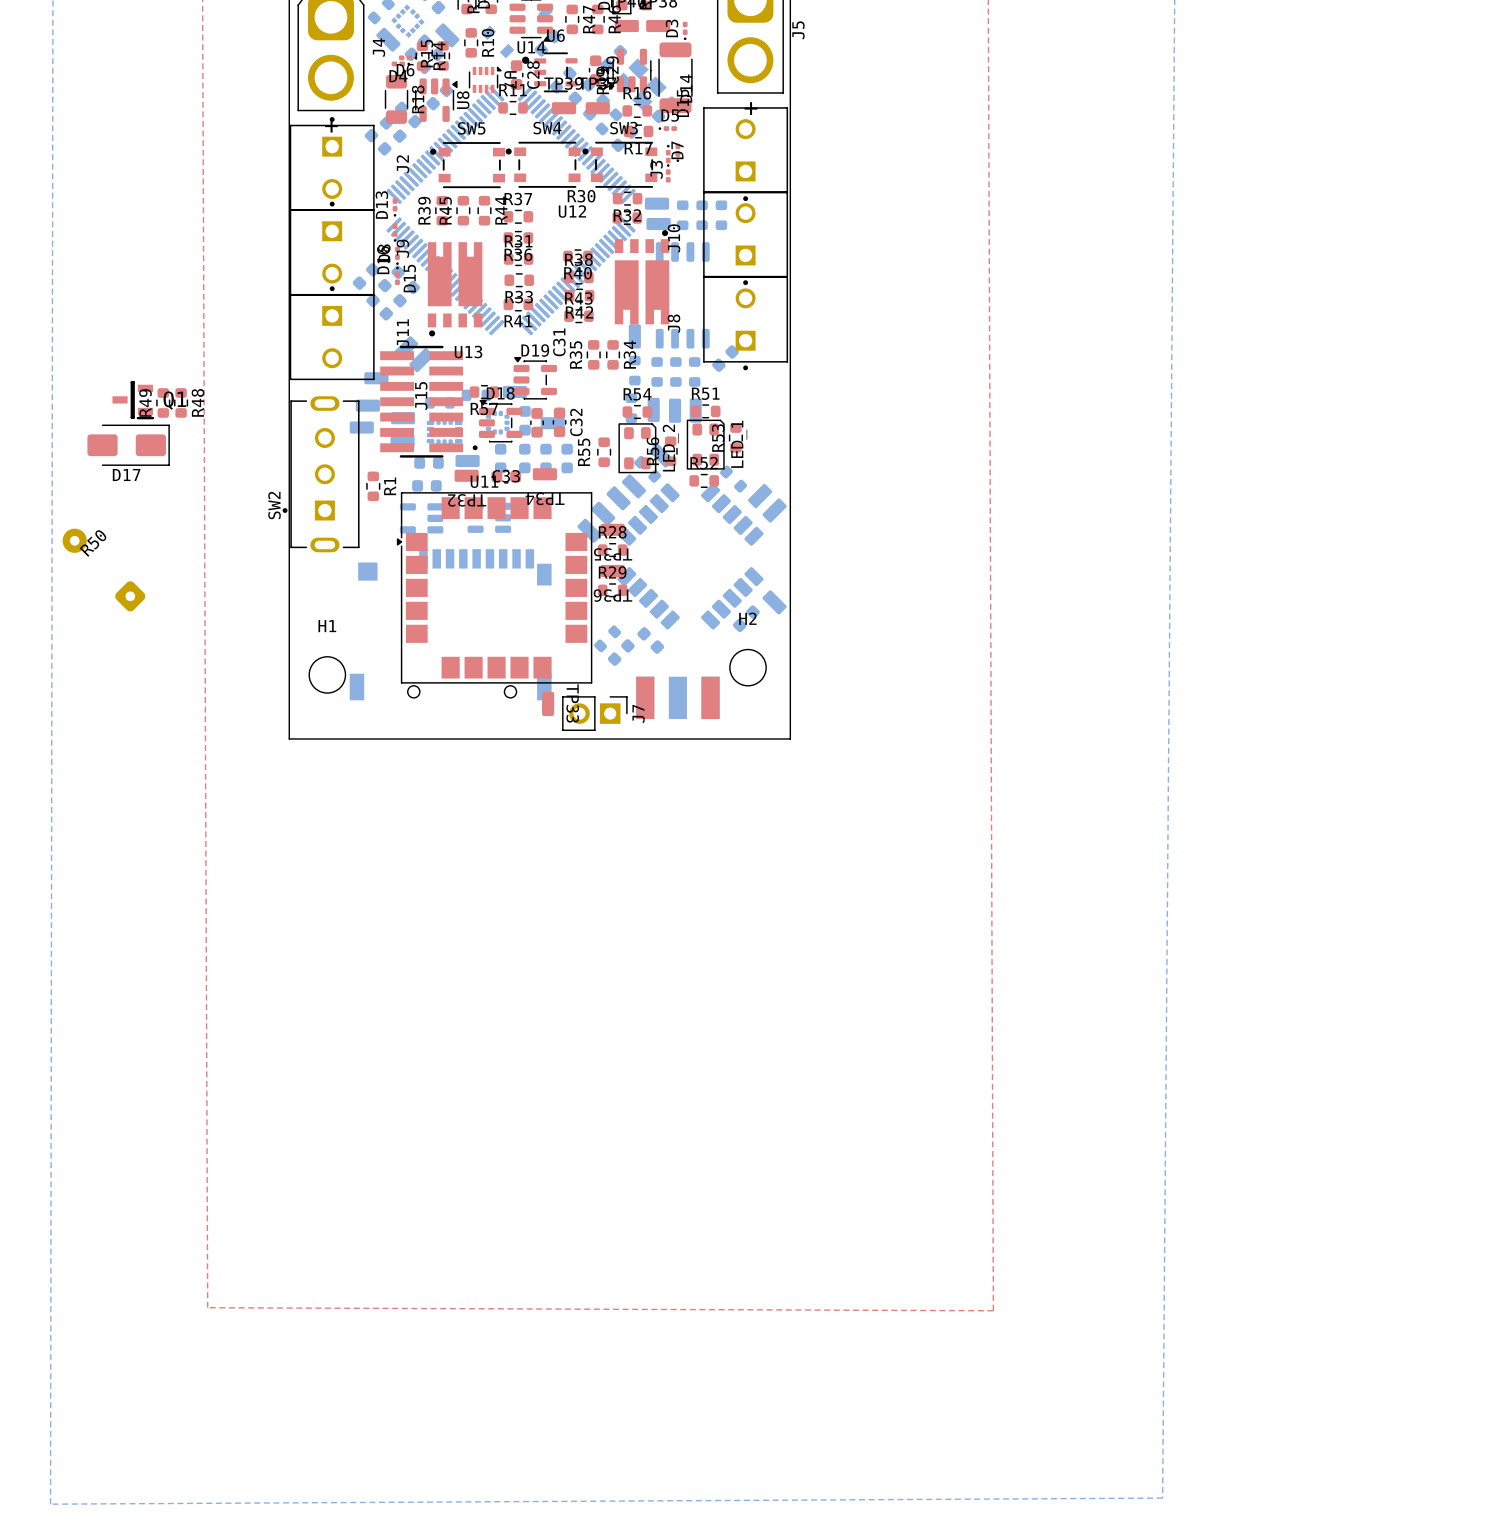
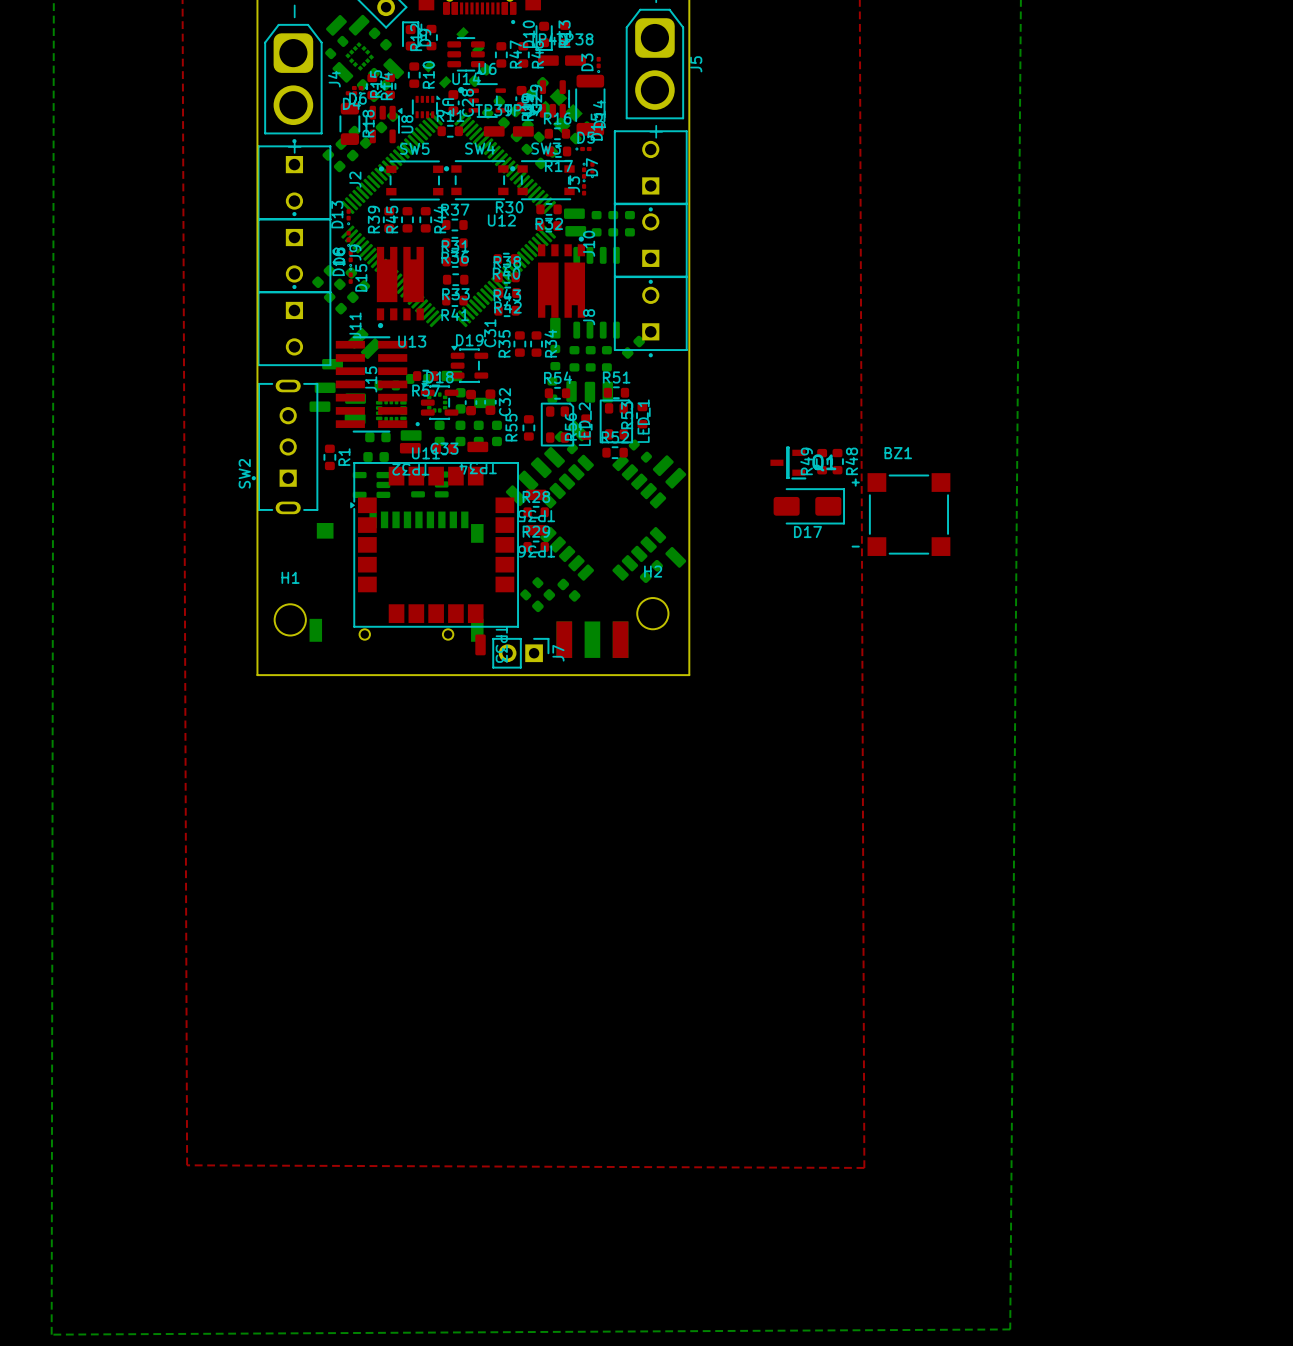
Q1 position: (133, 400) -> (788, 463)
R49 position: (163, 402) -> (822, 461)
R48 position: (181, 402) -> (837, 461)
D17 position: (128, 445) -> (809, 506)
BZ1: none -> (901, 514)
R50: (104, 570) -> none

